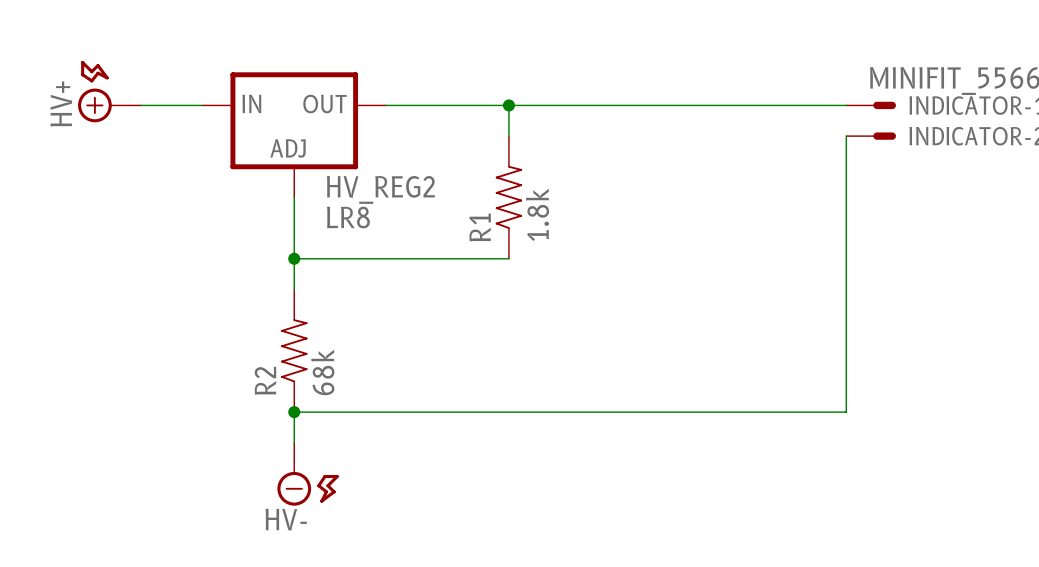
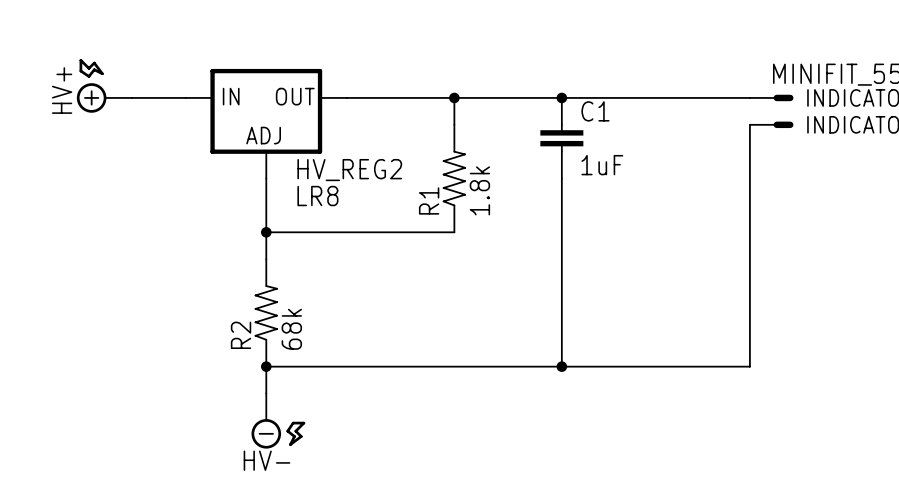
junction: none -> (561, 97)
C1: none -> 1uF (561, 138)
wire: none -> (561, 178) (561, 366)
junction: none -> (561, 366)

